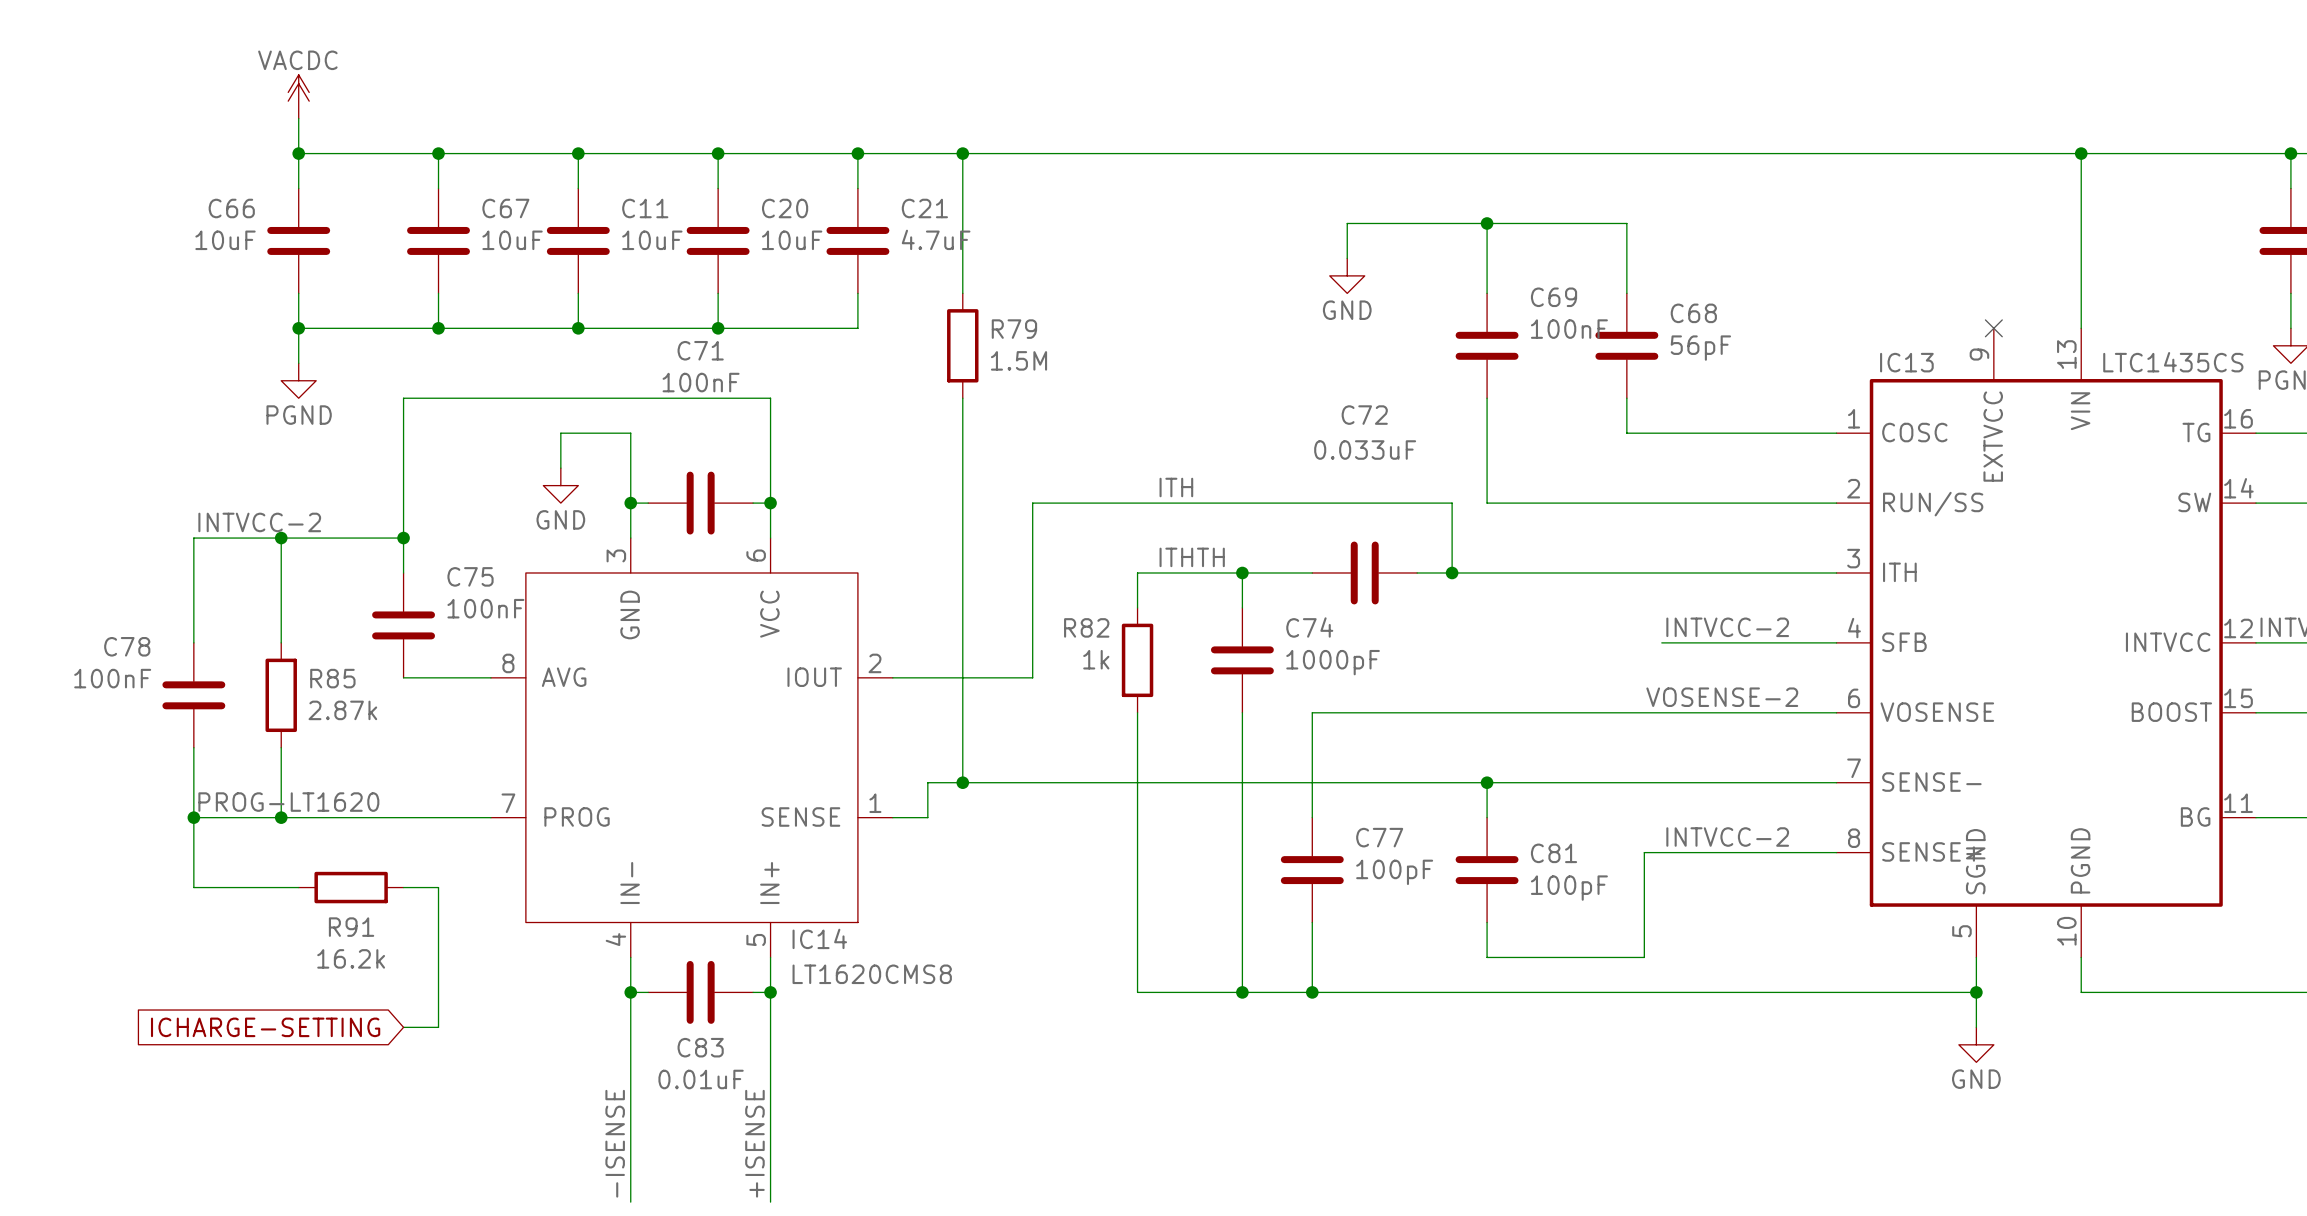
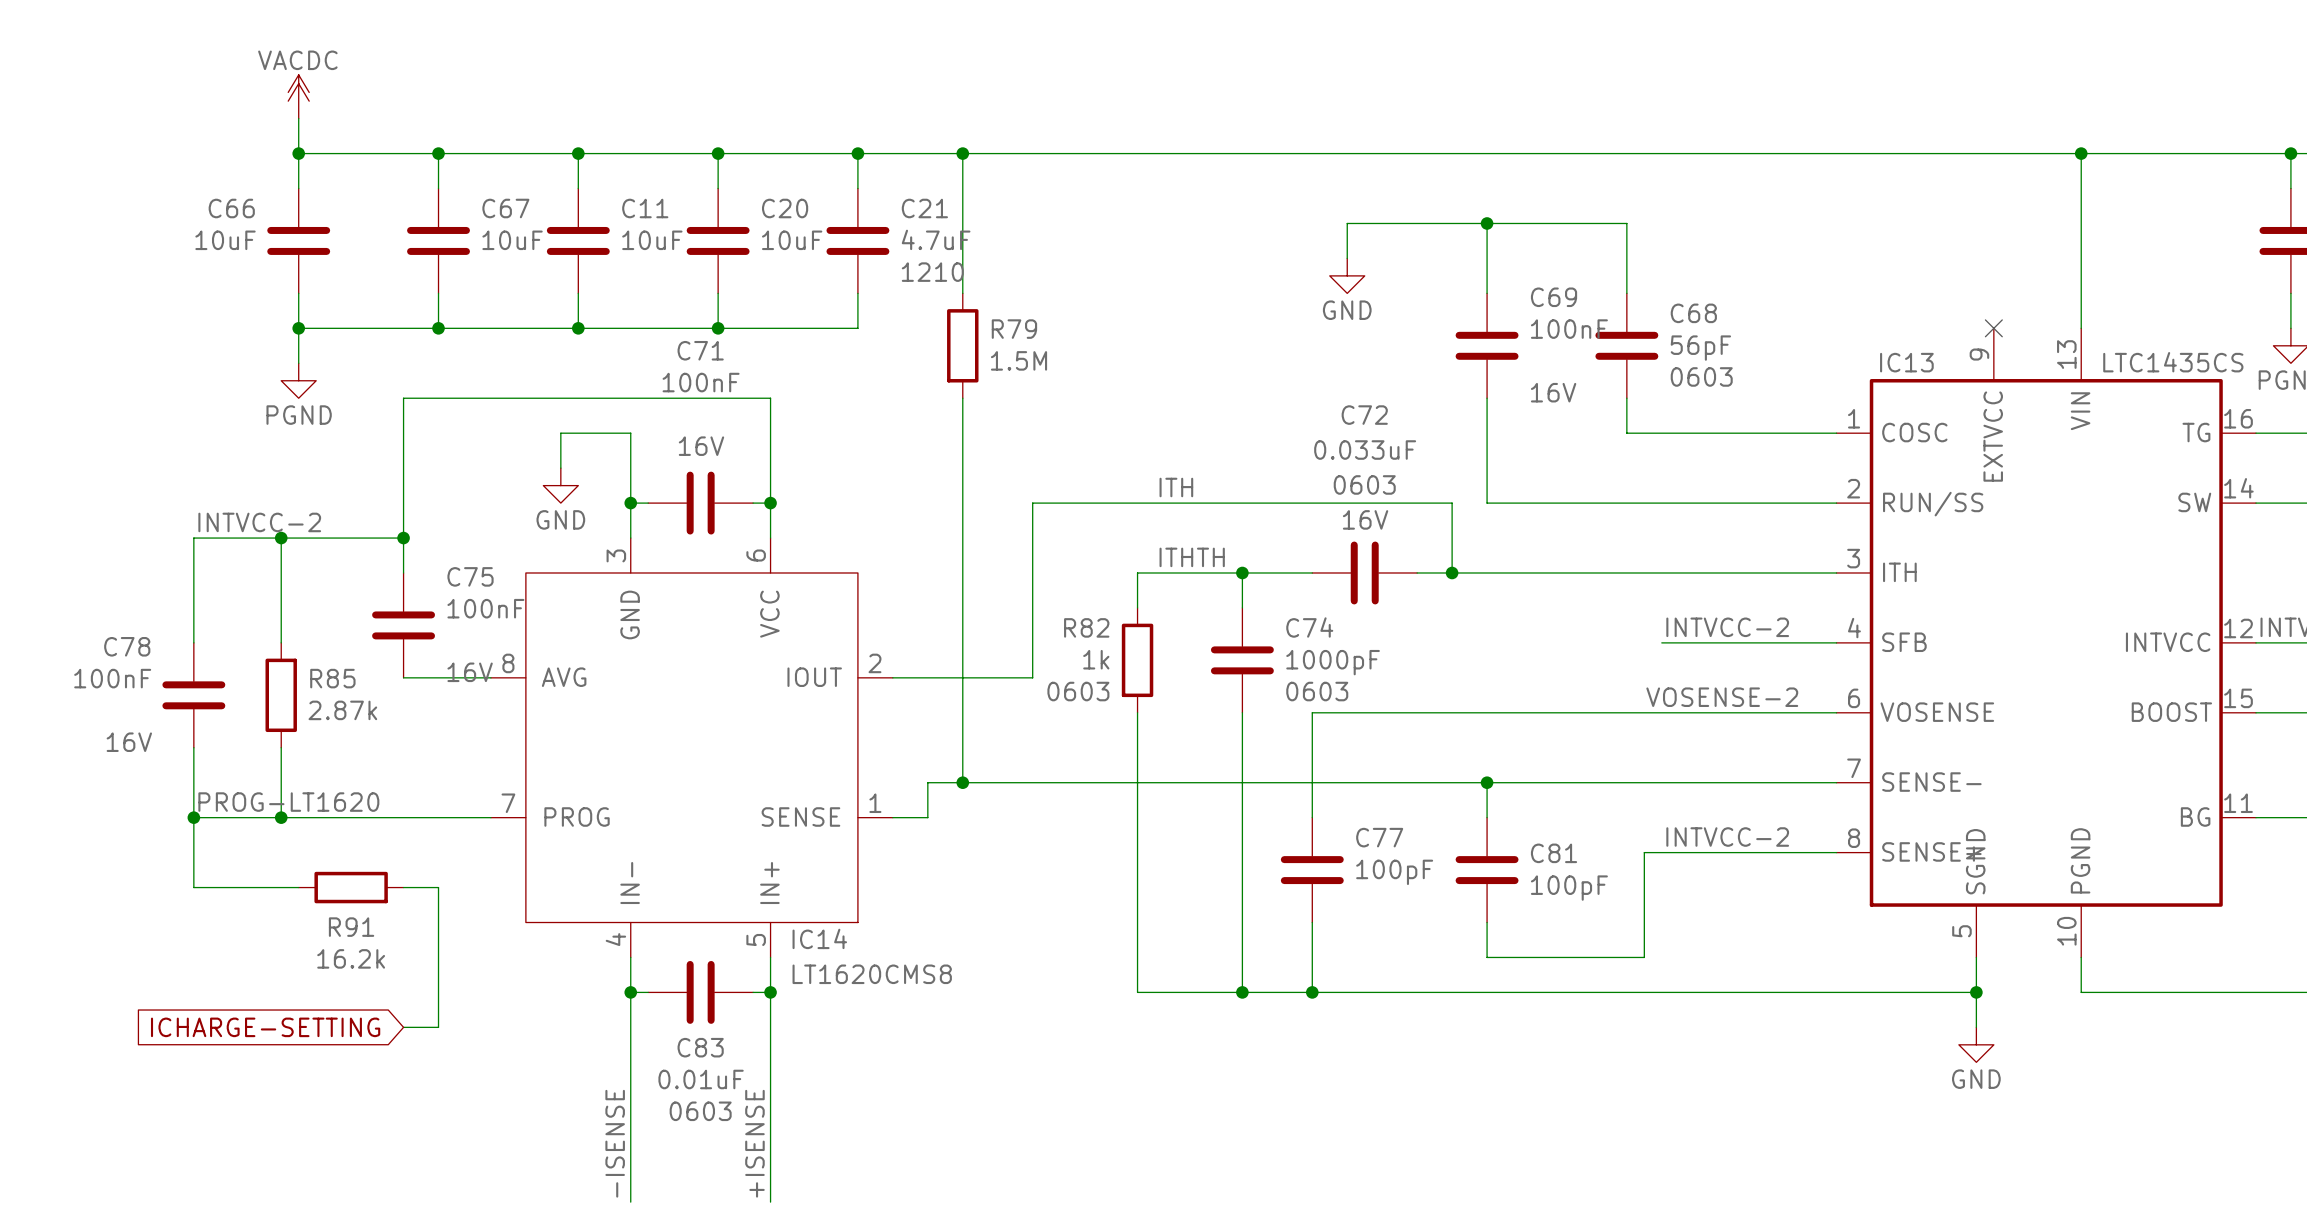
C21 text: none -> 1210 (932, 272)
C68 text: none -> 0603 (1701, 376)
C69 text: none -> 16V (1553, 392)
C71 text: none -> 16V (701, 446)
C72 text: none -> 0603 (1364, 484)
C72 text: none -> 16V (1365, 519)
C75 text: none -> 16V (470, 672)
R82 text: none -> 0603 (1078, 691)
C74 text: none -> 0603 (1317, 691)
C78 text: none -> 16V (129, 742)
C83 text: none -> 0603 (700, 1111)

